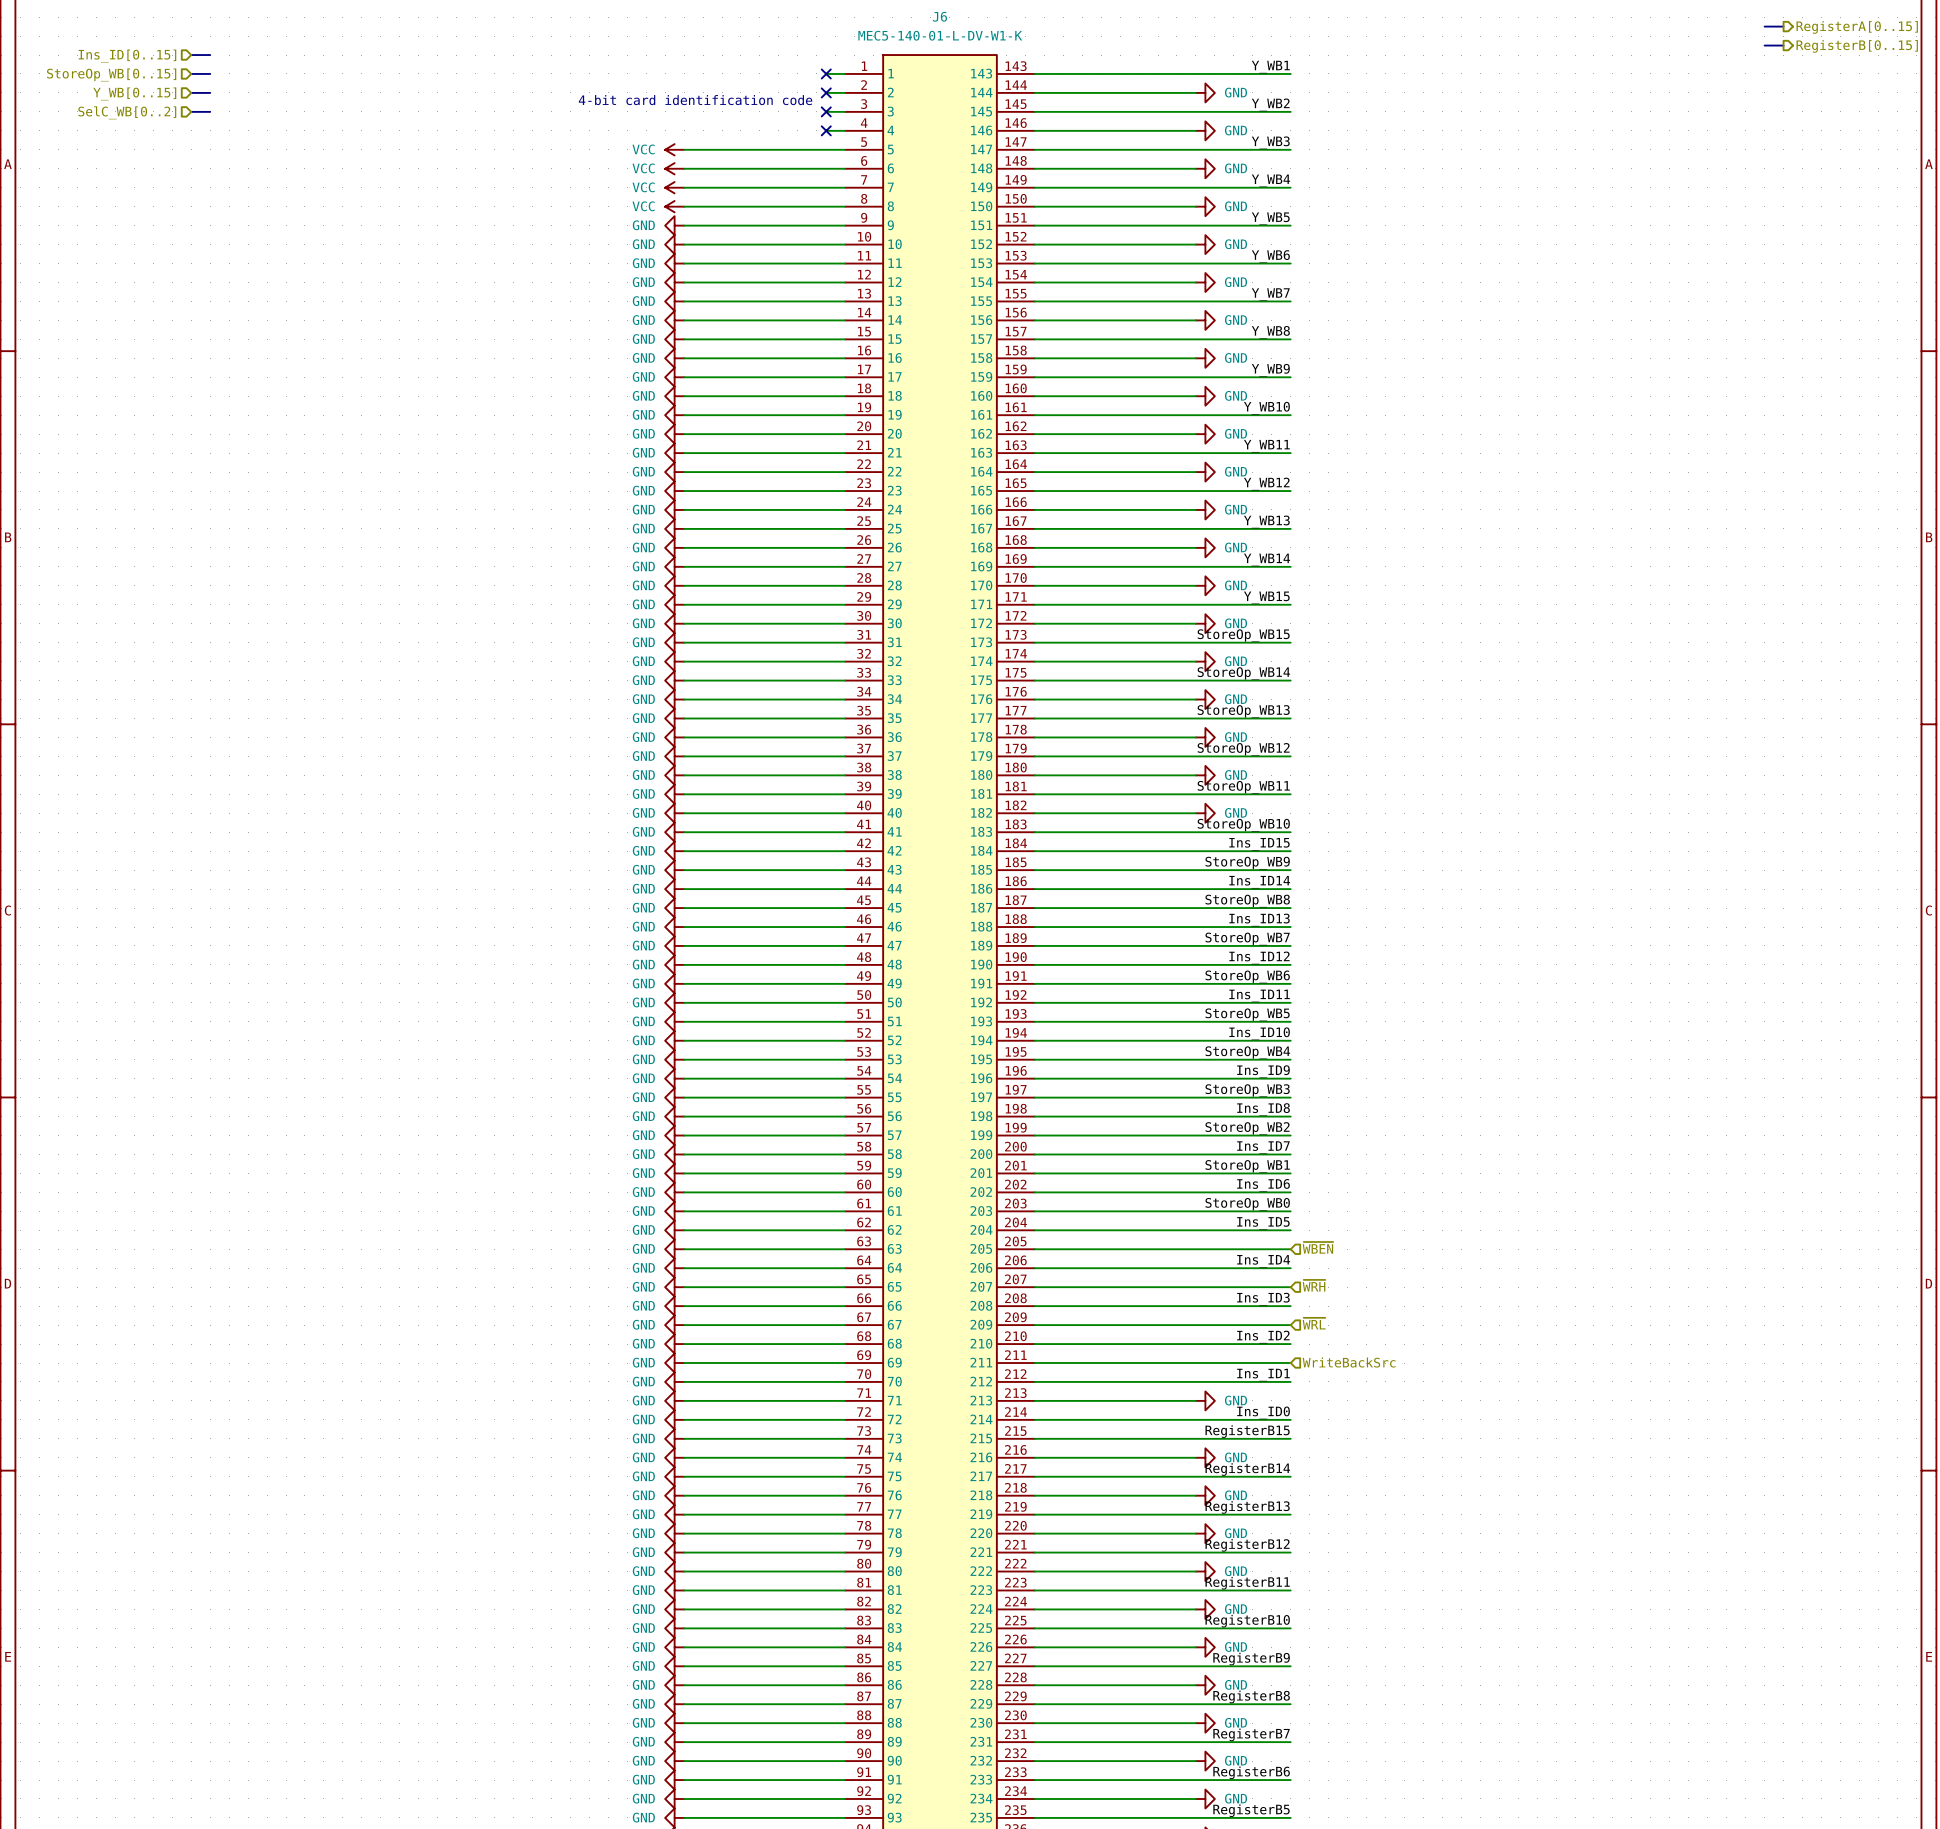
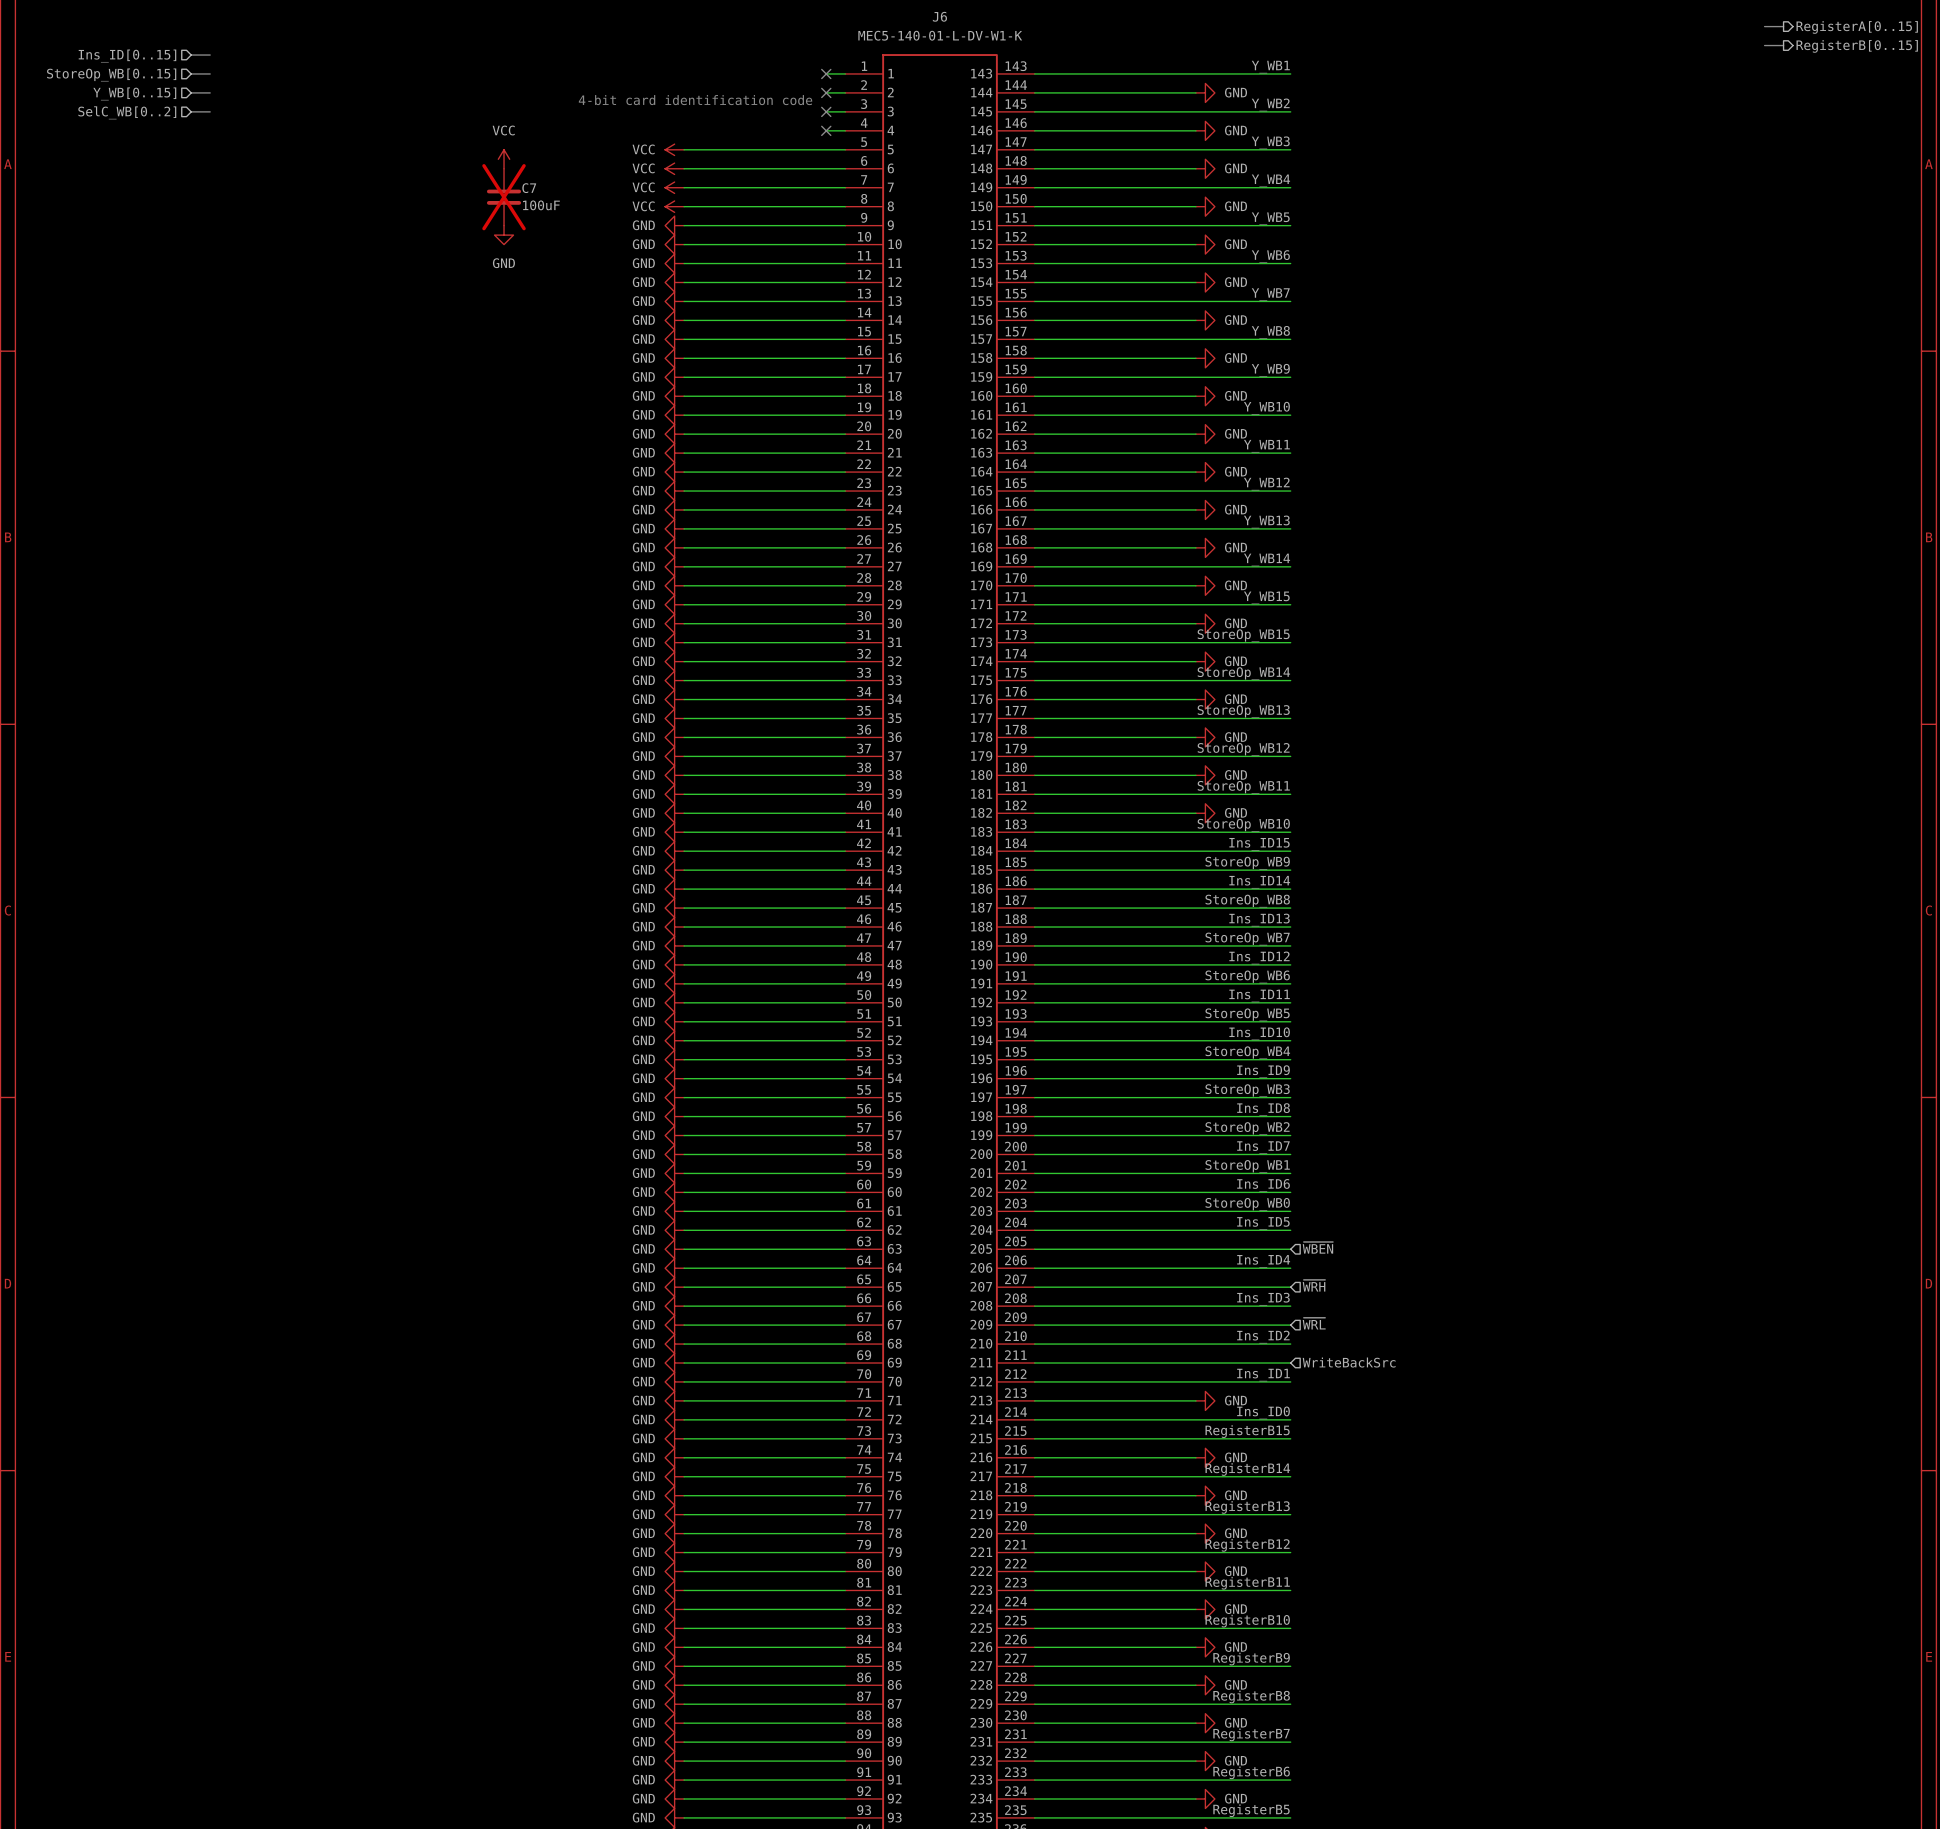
power symbol: none -> VCC (504, 159)
C7: none -> 100uF (504, 197)
power symbol: none -> GND (504, 235)

